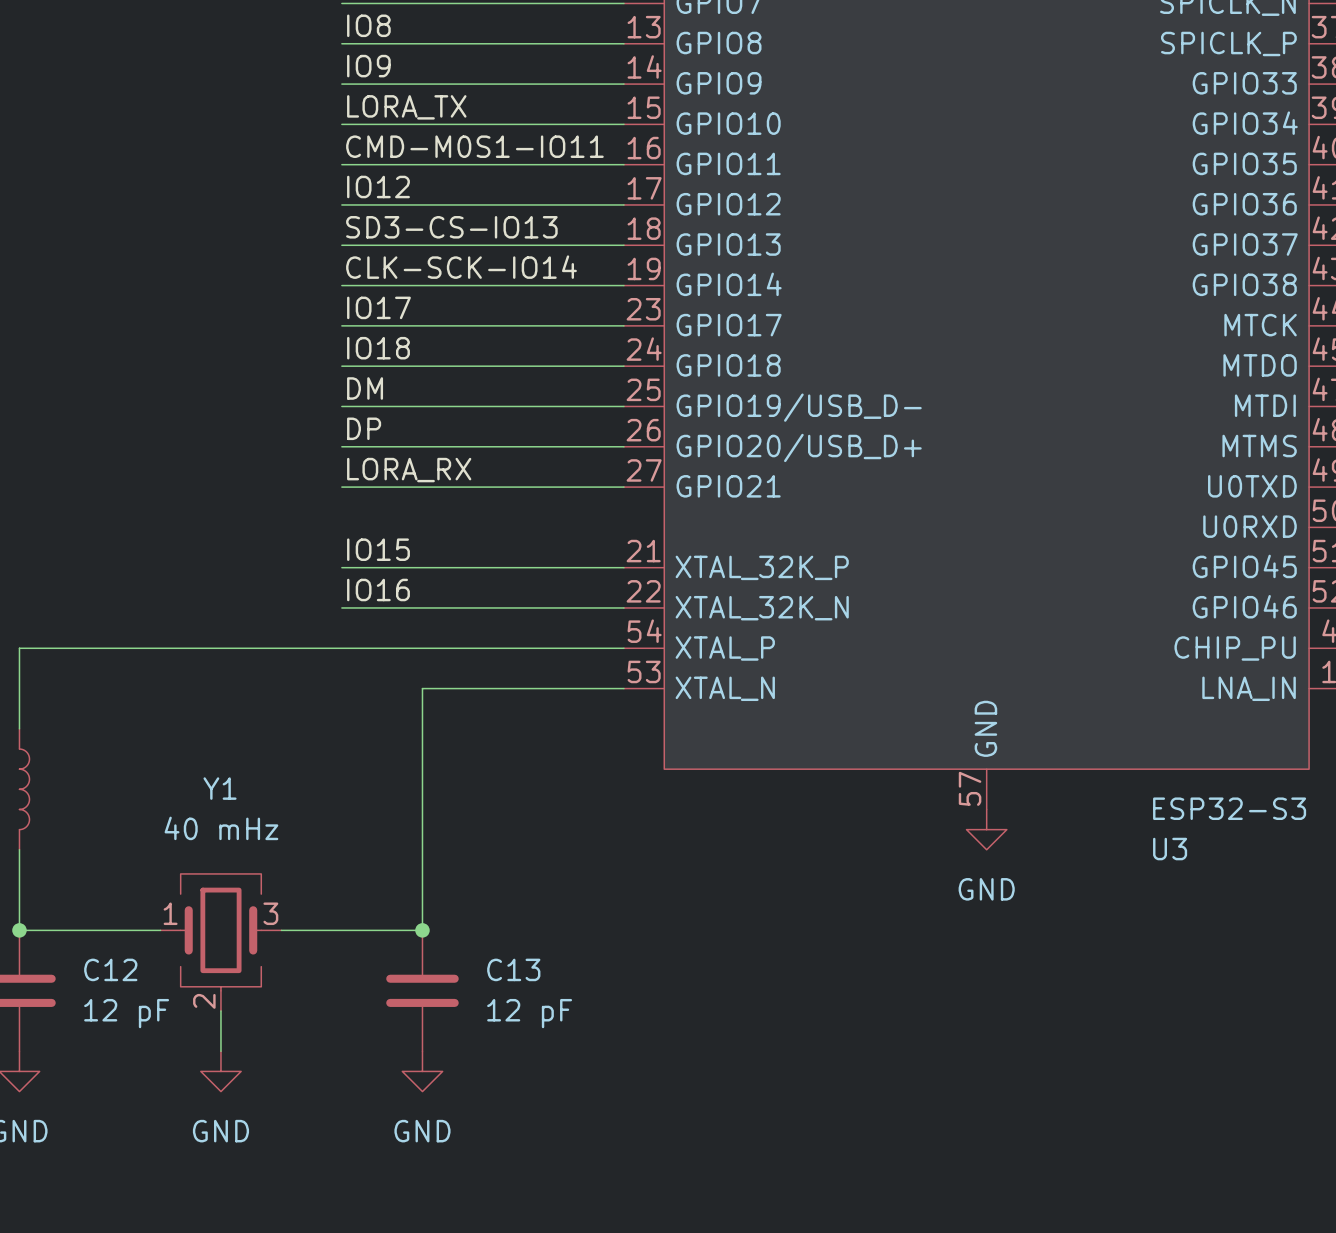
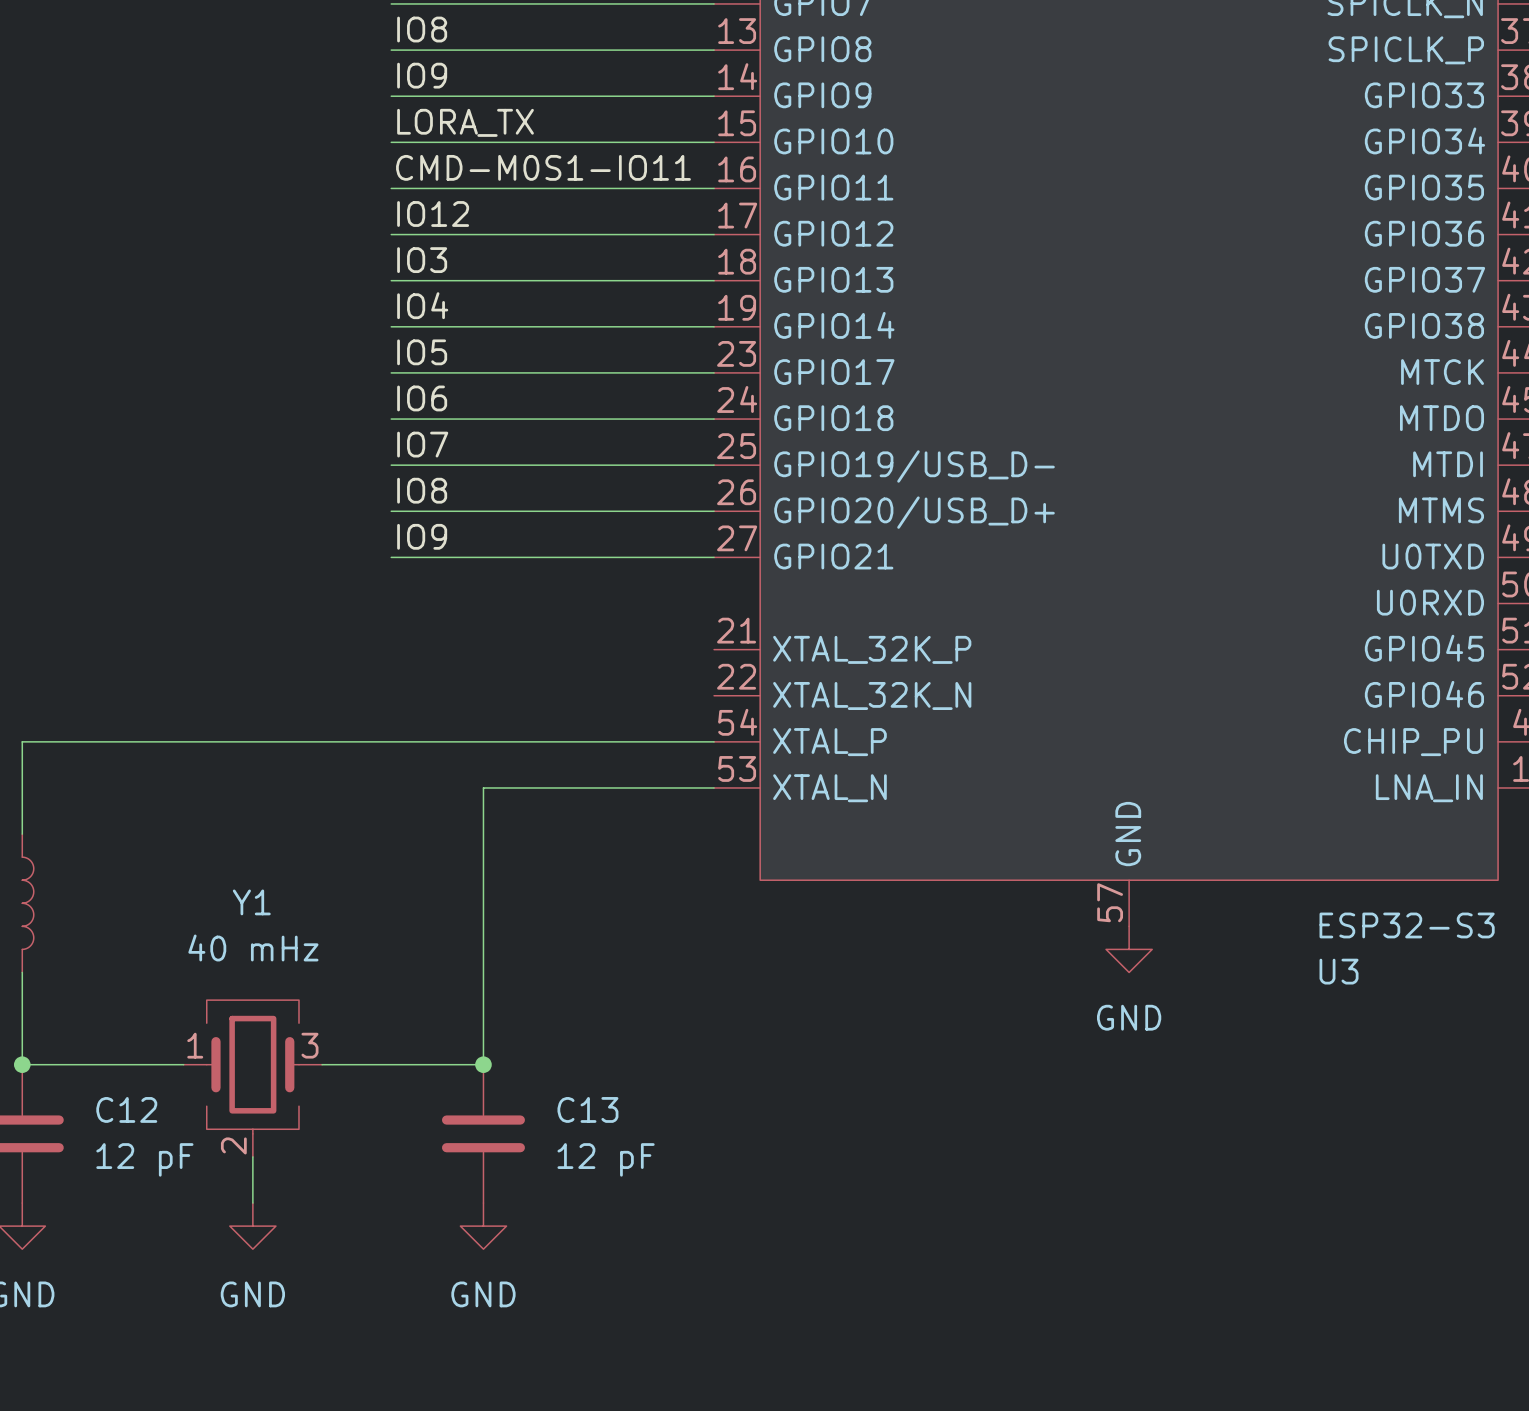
label: SD3-CS-IO13 (451, 227) -> IO3 (422, 260)
label: CLK-SCK-IO14 (461, 267) -> IO4 (422, 305)
label: IO17 (378, 307) -> IO5 (422, 352)
label: IO18 (378, 348) -> IO6 (422, 398)
label: DM (365, 388) -> IO7 (422, 444)
label: DP (364, 428) -> IO8 (422, 490)
label: LORA_RX (409, 470) -> IO9 (422, 536)
label: IO15 (378, 549) -> none
wire: (341, 567) (623, 567) -> none
label: IO16 (378, 590) -> none
wire: (341, 607) (623, 607) -> none

